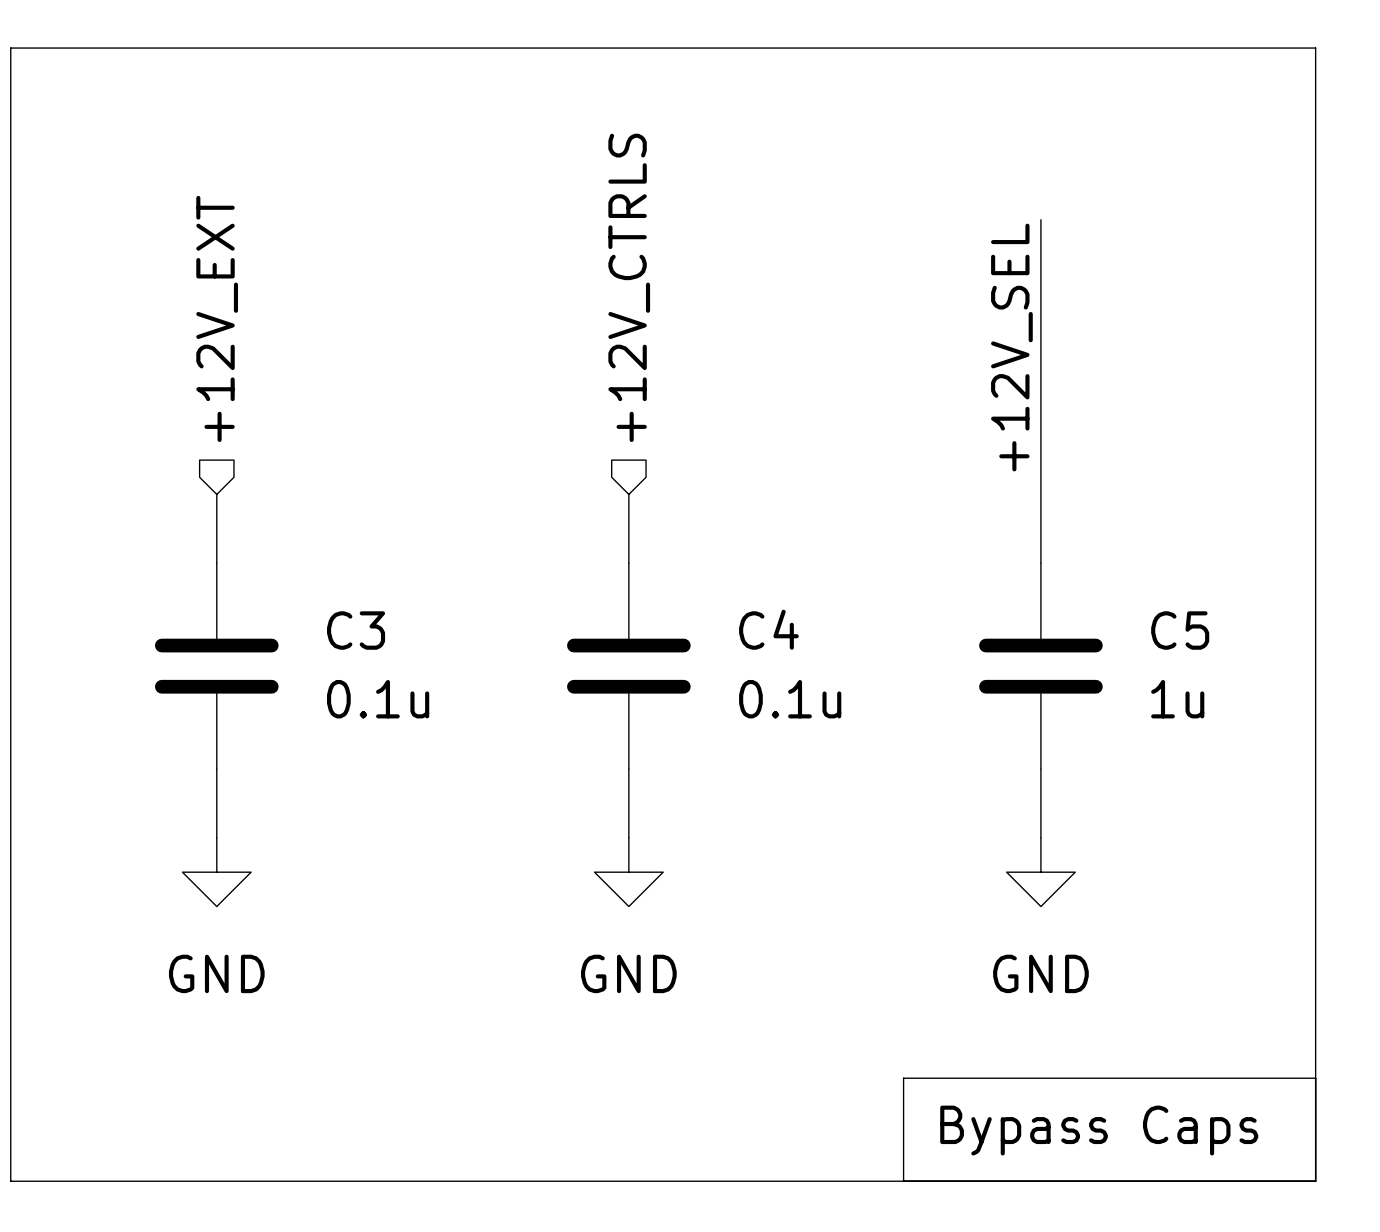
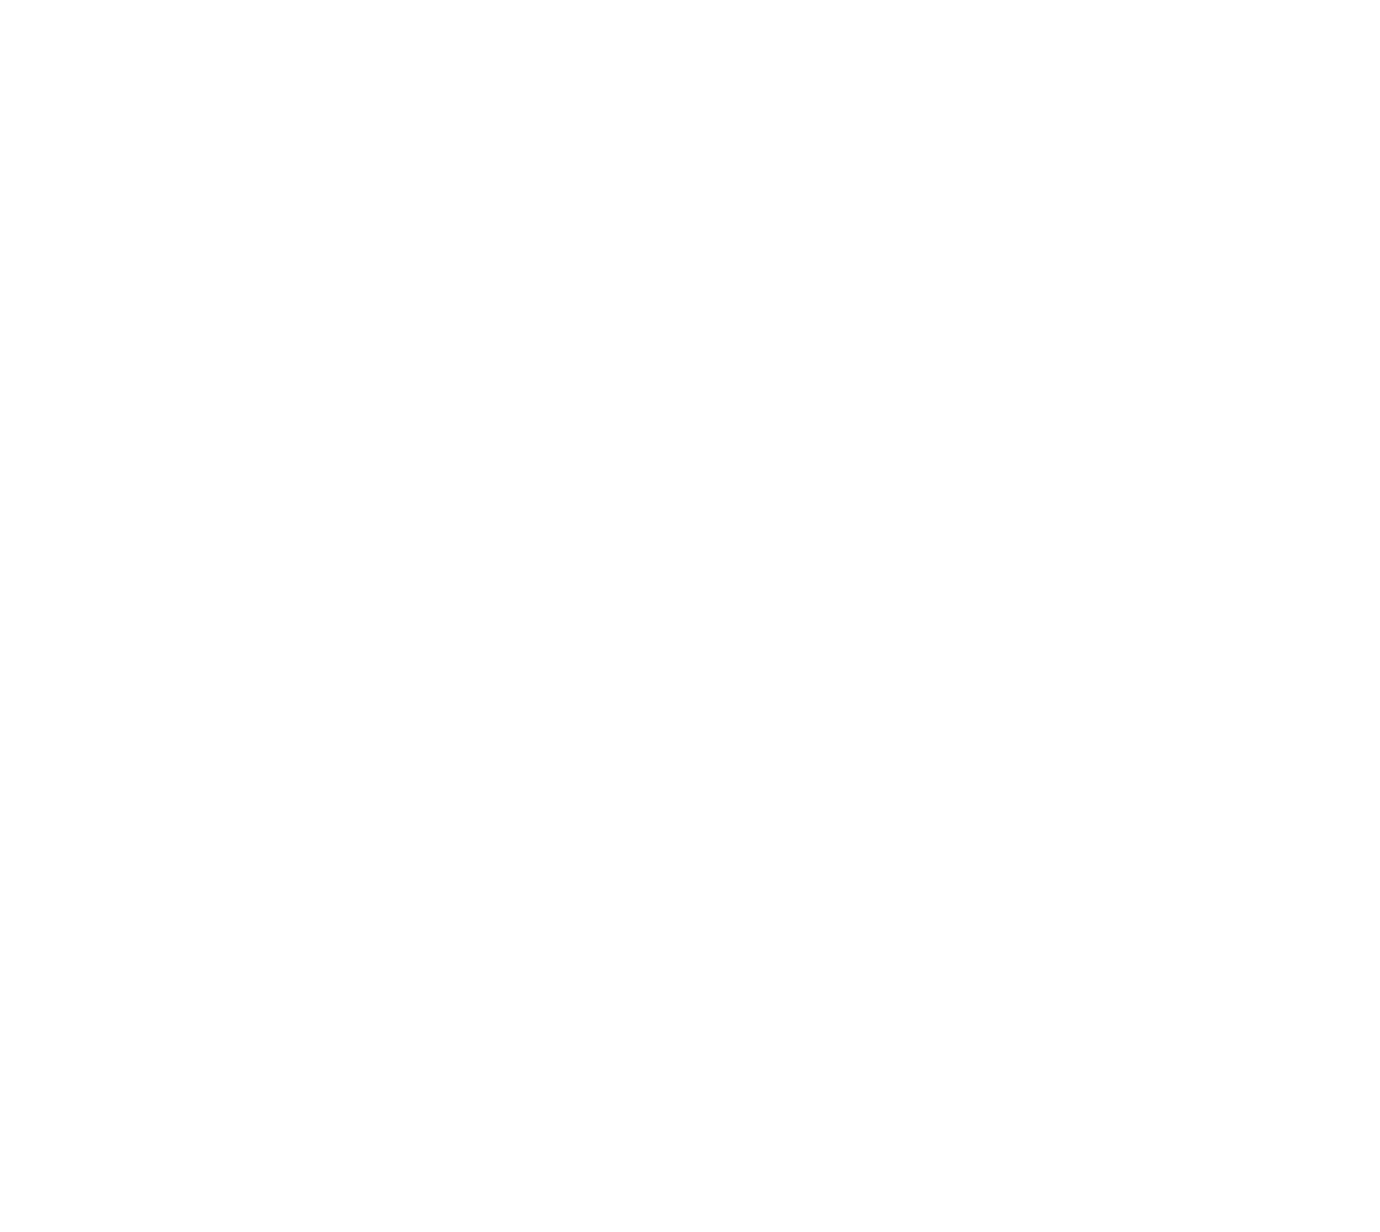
line: (10, 48) (1315, 48) (1315, 1181) (10, 1181) (10, 48) -> none
wire: (1040, 219) (1040, 563) -> none
hierarchical label: +12V_CTRLS (629, 287) -> none
hierarchical label: +12V_EXT (217, 318) -> none
label: +12V_SEL (1011, 347) -> none
wire: (216, 494) (216, 563) -> none
wire: (628, 494) (628, 563) -> none
C3: 0.1u (216, 666) -> none
C4: 0.1u (628, 666) -> none
C5: 1u (1040, 666) -> none
wire: (216, 769) (216, 837) -> none
wire: (628, 769) (628, 837) -> none
wire: (1040, 769) (1040, 837) -> none
power symbol: GND (216, 872) -> none
power symbol: GND (628, 872) -> none
power symbol: GND (1040, 872) -> none
line: (1315, 1078) (903, 1078) (903, 1181) -> none
text: Bypass Caps (1099, 1130) -> none

